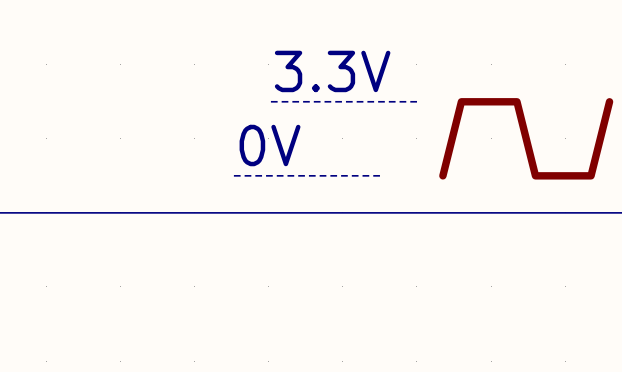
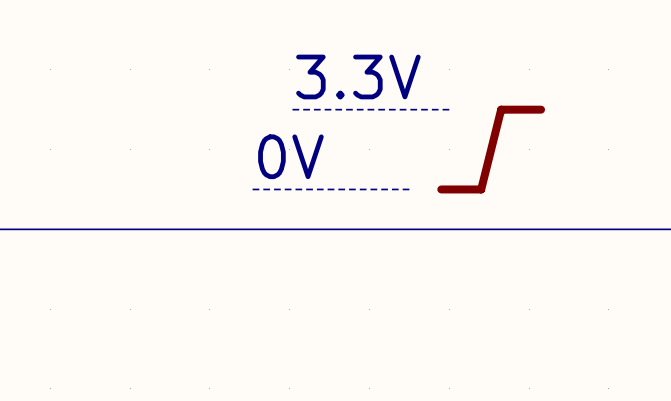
power symbol: none -> (491, 149)
power symbol: (526, 138) -> none

